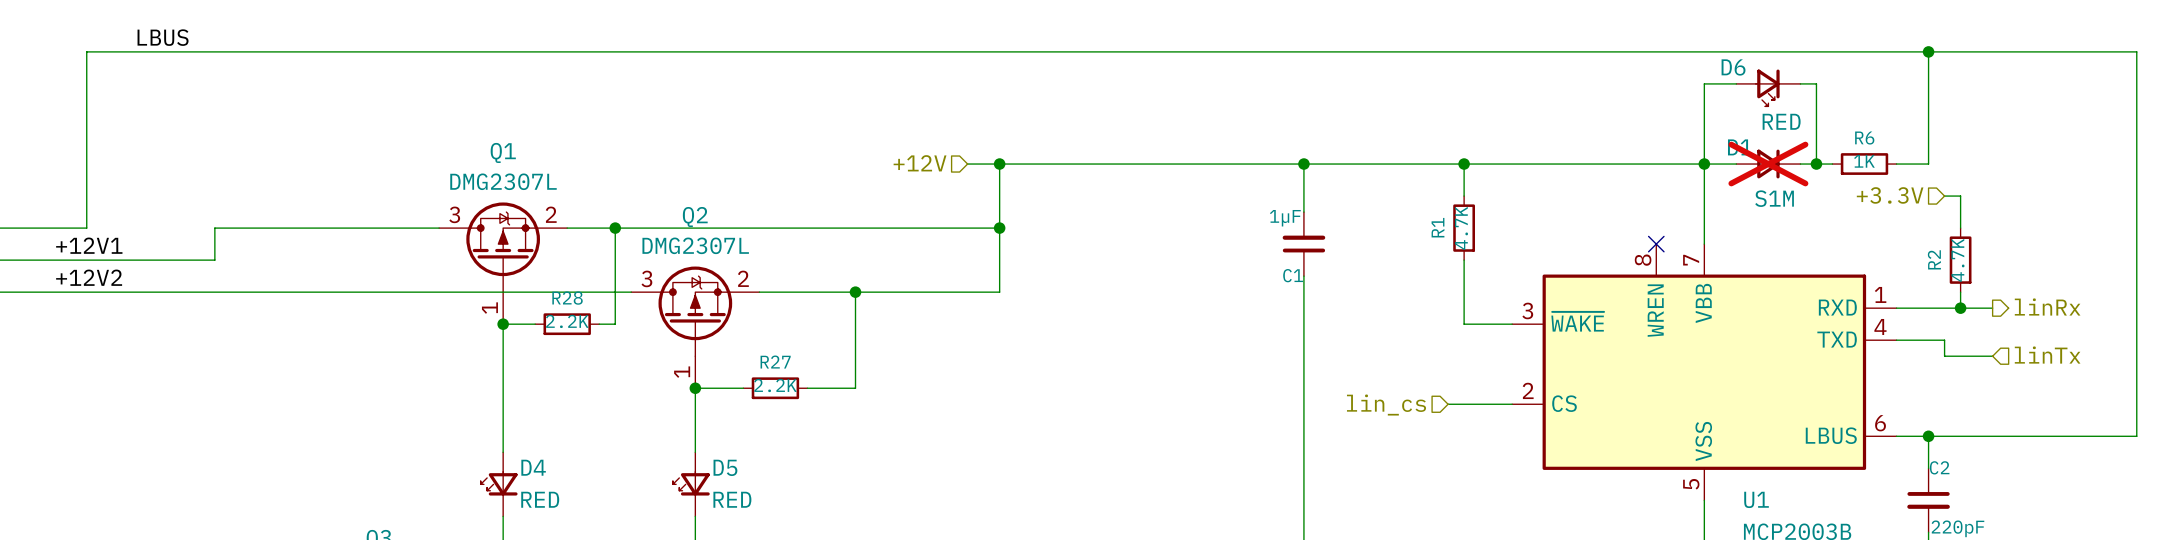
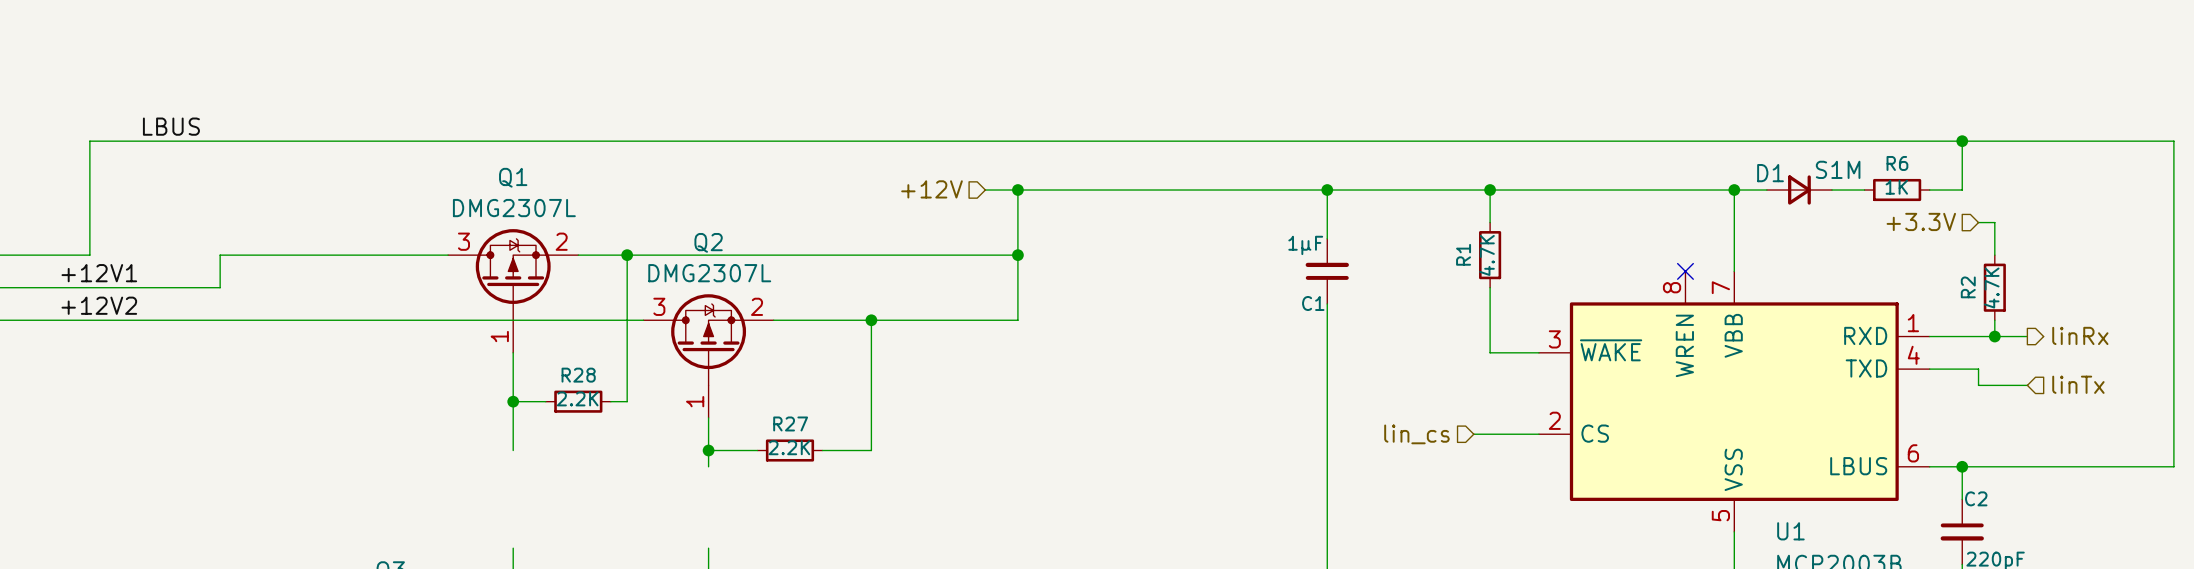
label position: LBUS (163, 37) -> LBUS (171, 126)
wire: (1928, 51) (1928, 115) -> none
junction: (1928, 51) -> none
wire: (1736, 83) (1704, 83) (1704, 164) -> none
wire: (1800, 83) (1816, 83) (1816, 164) -> none
D6: RED (1768, 87) -> none
wire: (86, 115) (86, 51) (2136, 51) (2136, 115) -> (89, 141) (2173, 141)
junction: none -> (1962, 141)
D1 do-not-place cross: (1768, 164) -> none
junction: (1816, 164) -> none
D1 value position: S1M (1774, 198) -> S1M (1838, 169)
wire: (503, 324) (535, 324) -> (513, 401) (545, 401)
junction position: (503, 324) -> (513, 401)
R28 position: (567, 324) -> (578, 401)
wire: (599, 324) (615, 324) -> (610, 401) (627, 401) (627, 352)
wire: (695, 388) (743, 388) -> (708, 450) (757, 450)
junction position: (695, 388) -> (708, 450)
R27 position: (775, 388) -> (789, 450)
wire: (807, 388) (855, 388) -> (822, 450) (871, 450) (871, 417)
wire: (503, 420) (503, 452) -> none
wire: (695, 436) (695, 452) -> none
D4: RED (499, 484) -> none
D5: RED (691, 484) -> none

